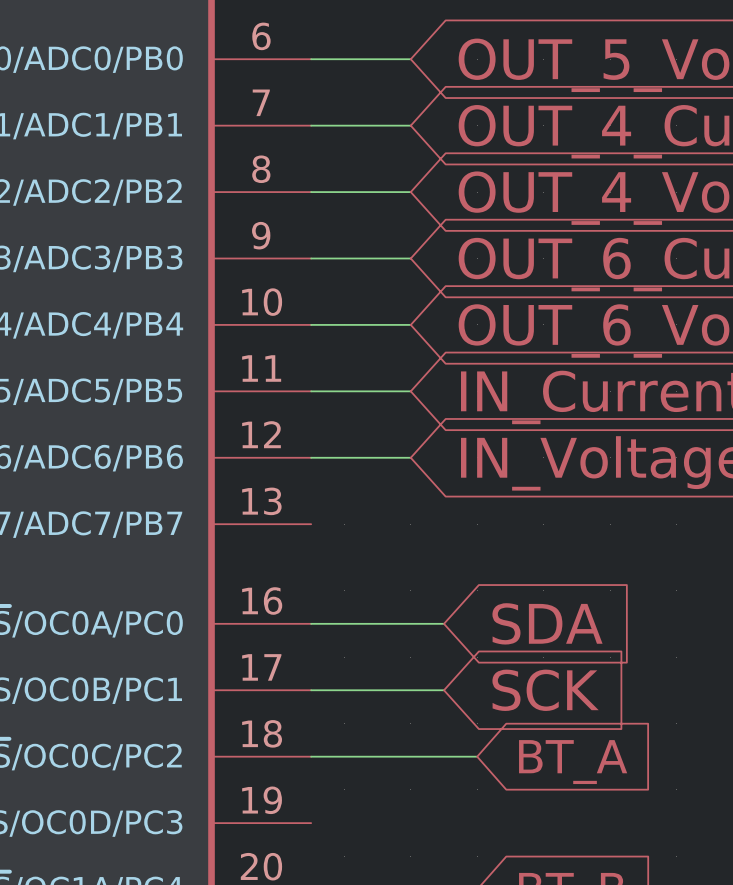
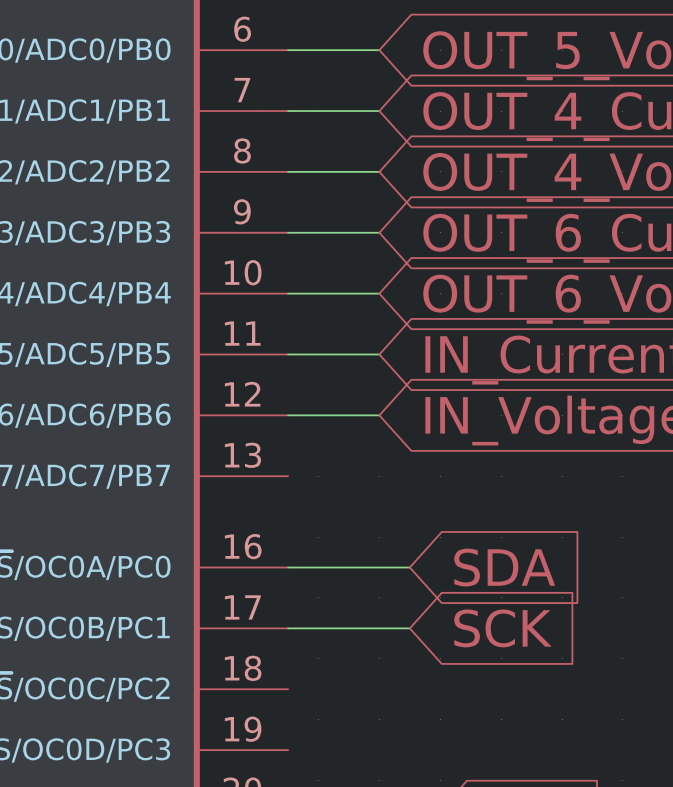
wire: (311, 756) (477, 756) -> none
global label: BT_A (573, 762) -> none

